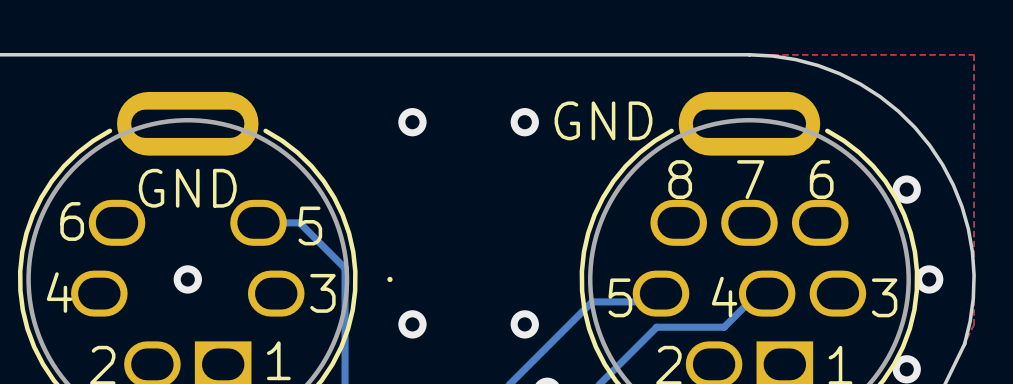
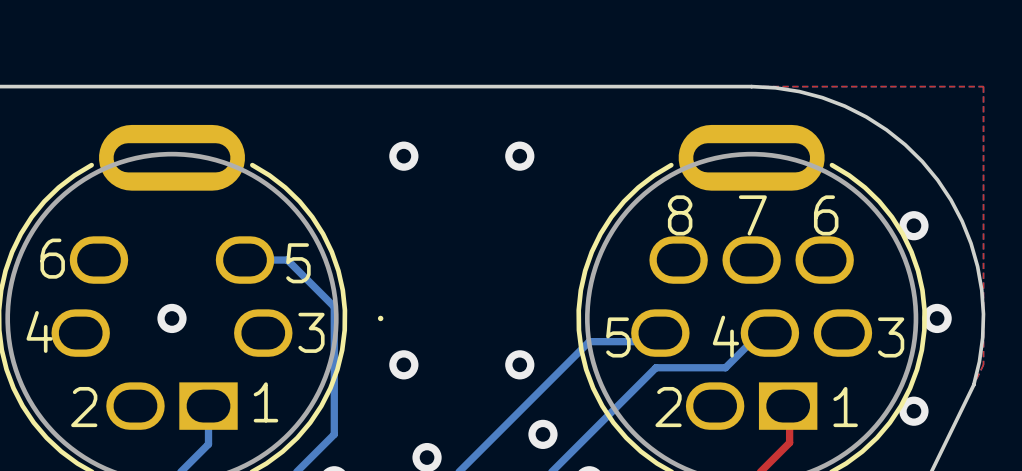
part text: GND (603, 120) -> none
part text: GND (187, 188) -> none

